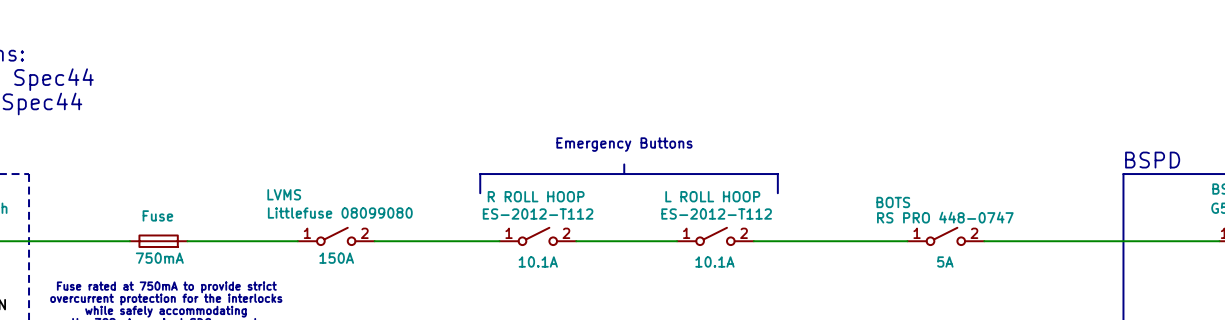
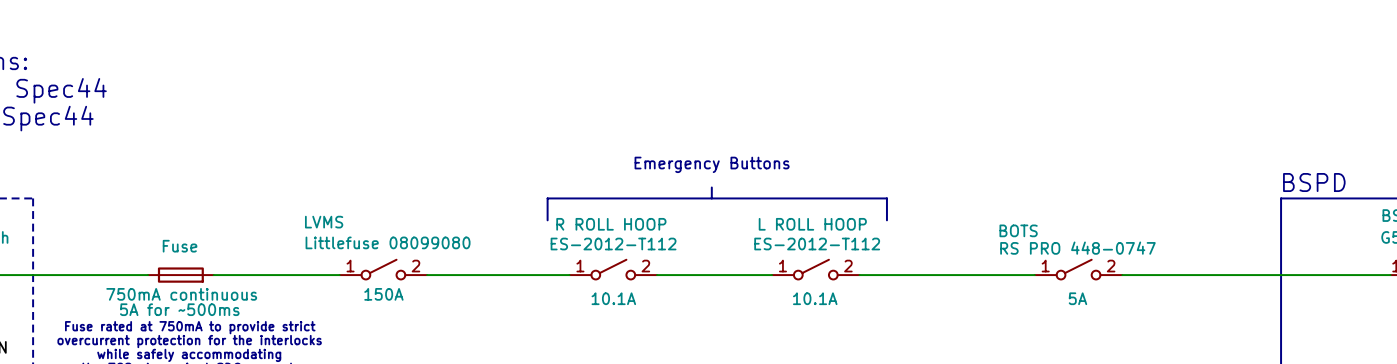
part text: 750mA (159, 258) -> 750mA continuous (181, 294)
part text: none -> 5A for ~500ms (179, 309)

